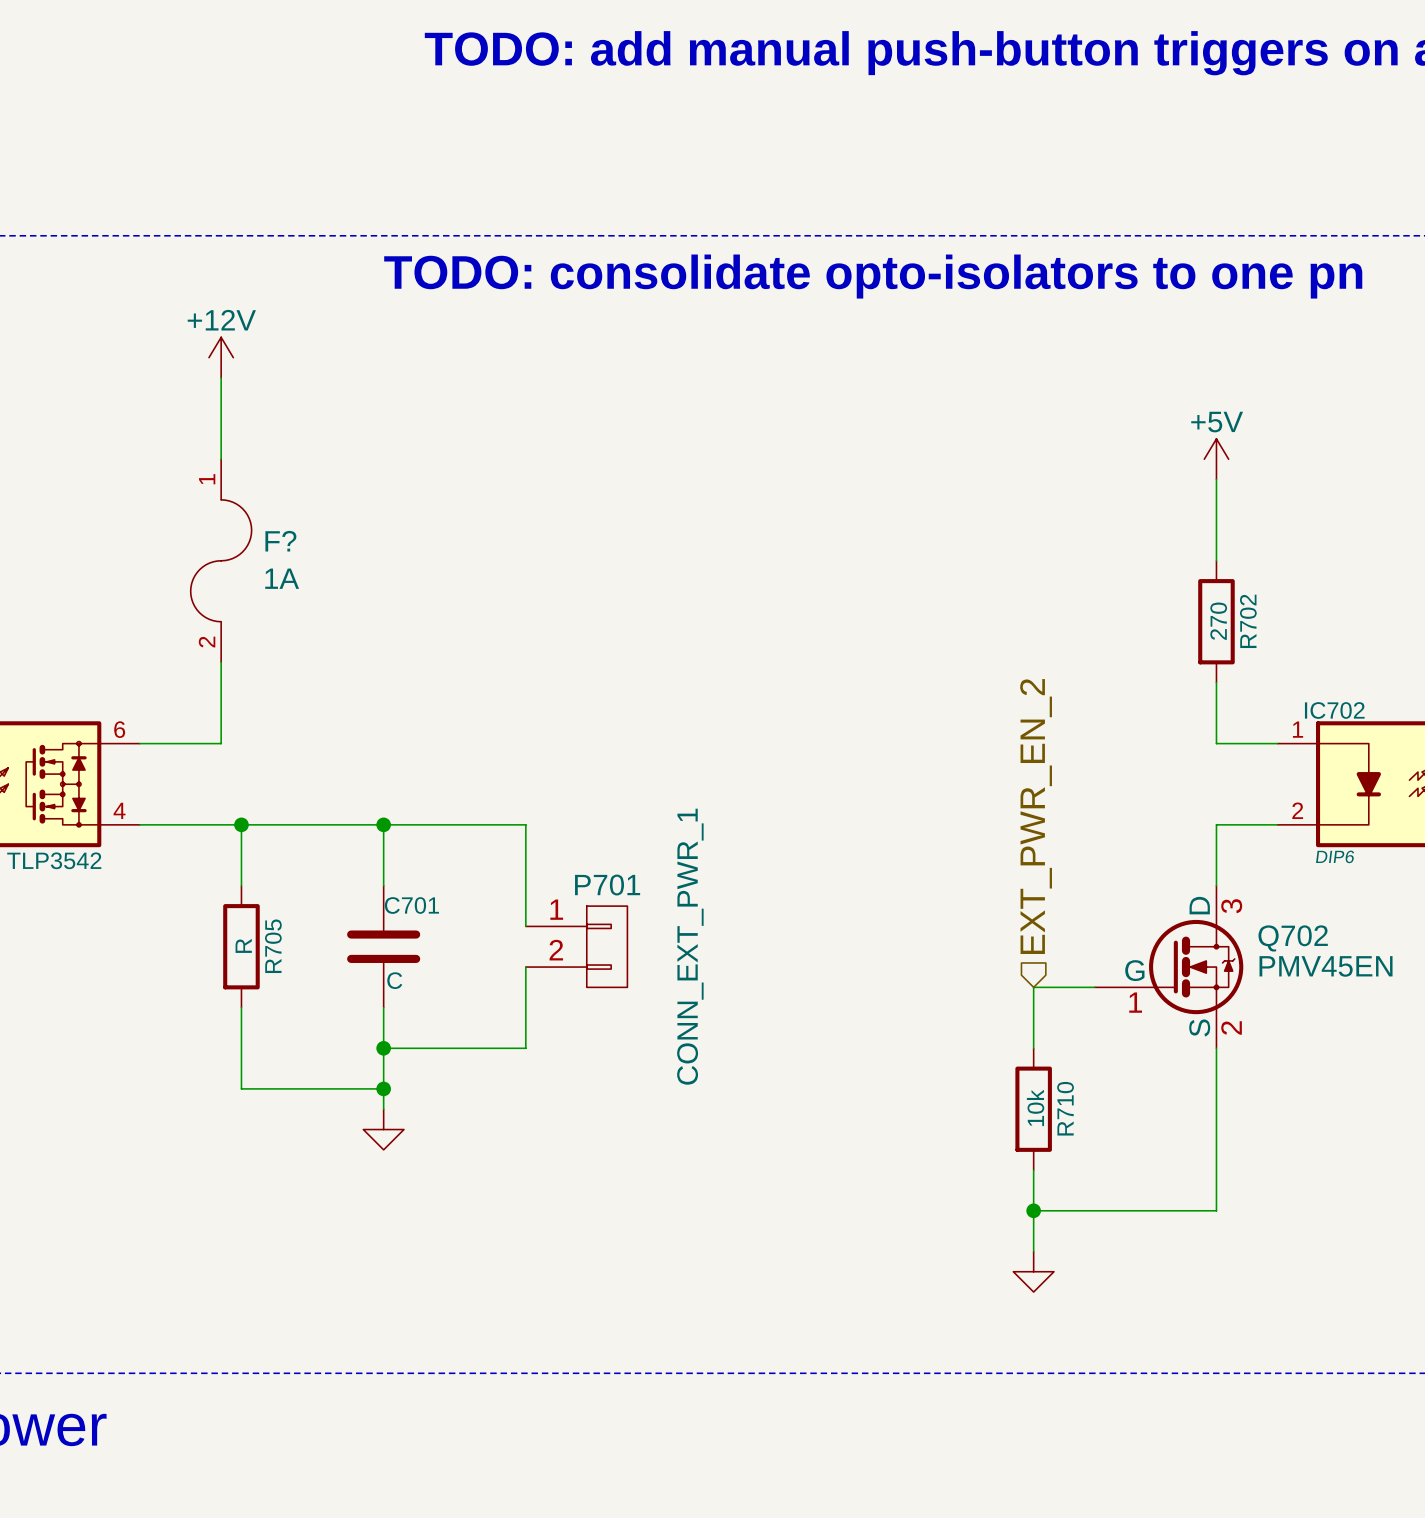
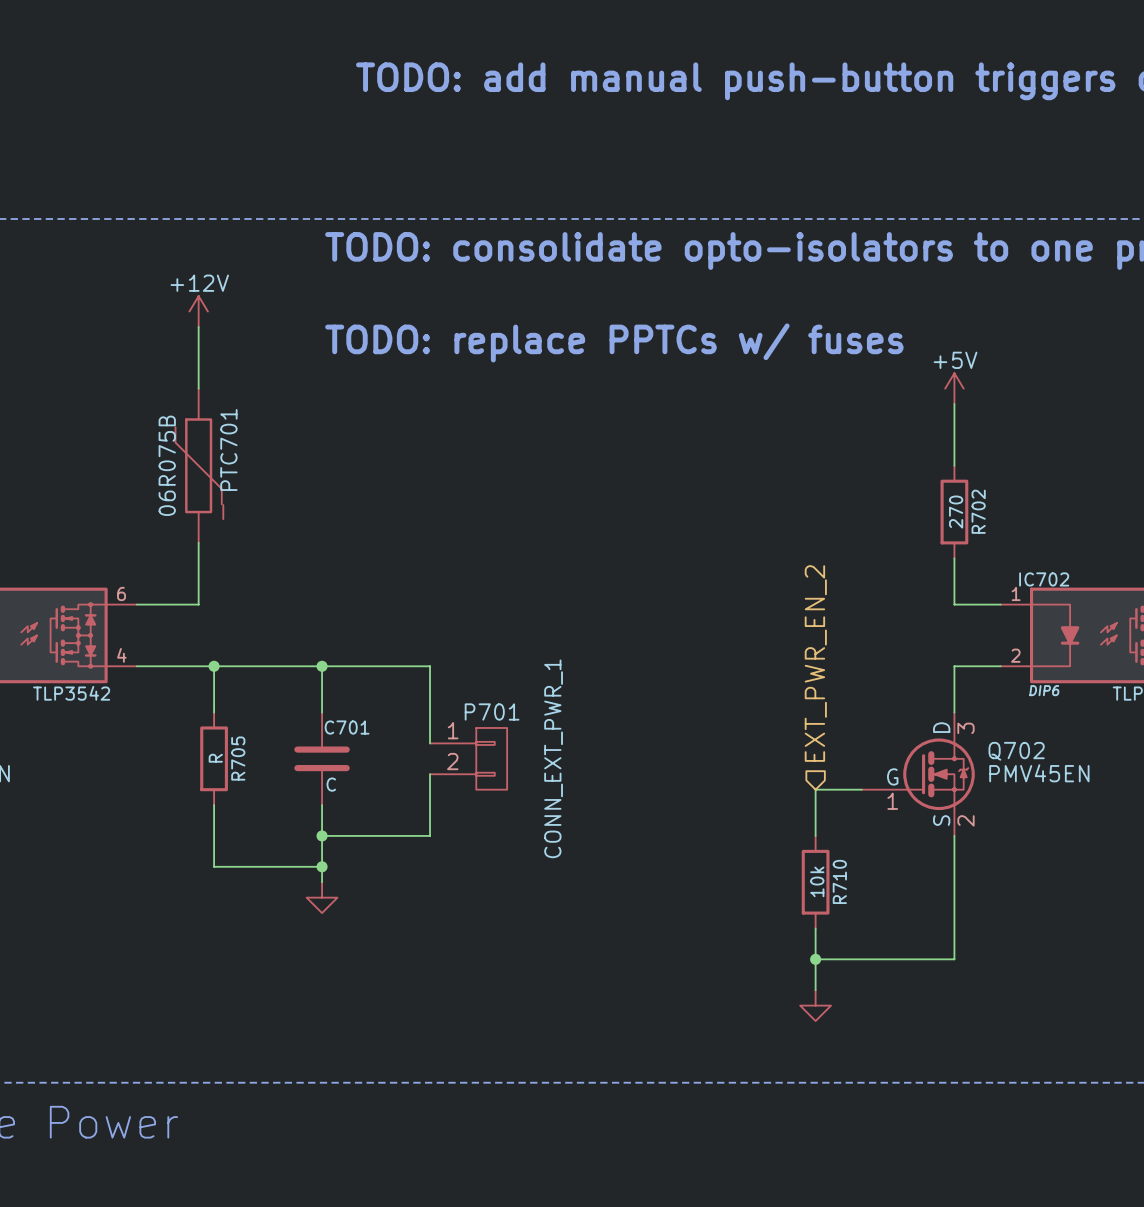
text: none -> TODO: replace PPTCs w/ fuses (614, 342)
F?: 1A (221, 560) -> none
PTC701: none -> 06R075B (198, 465)

